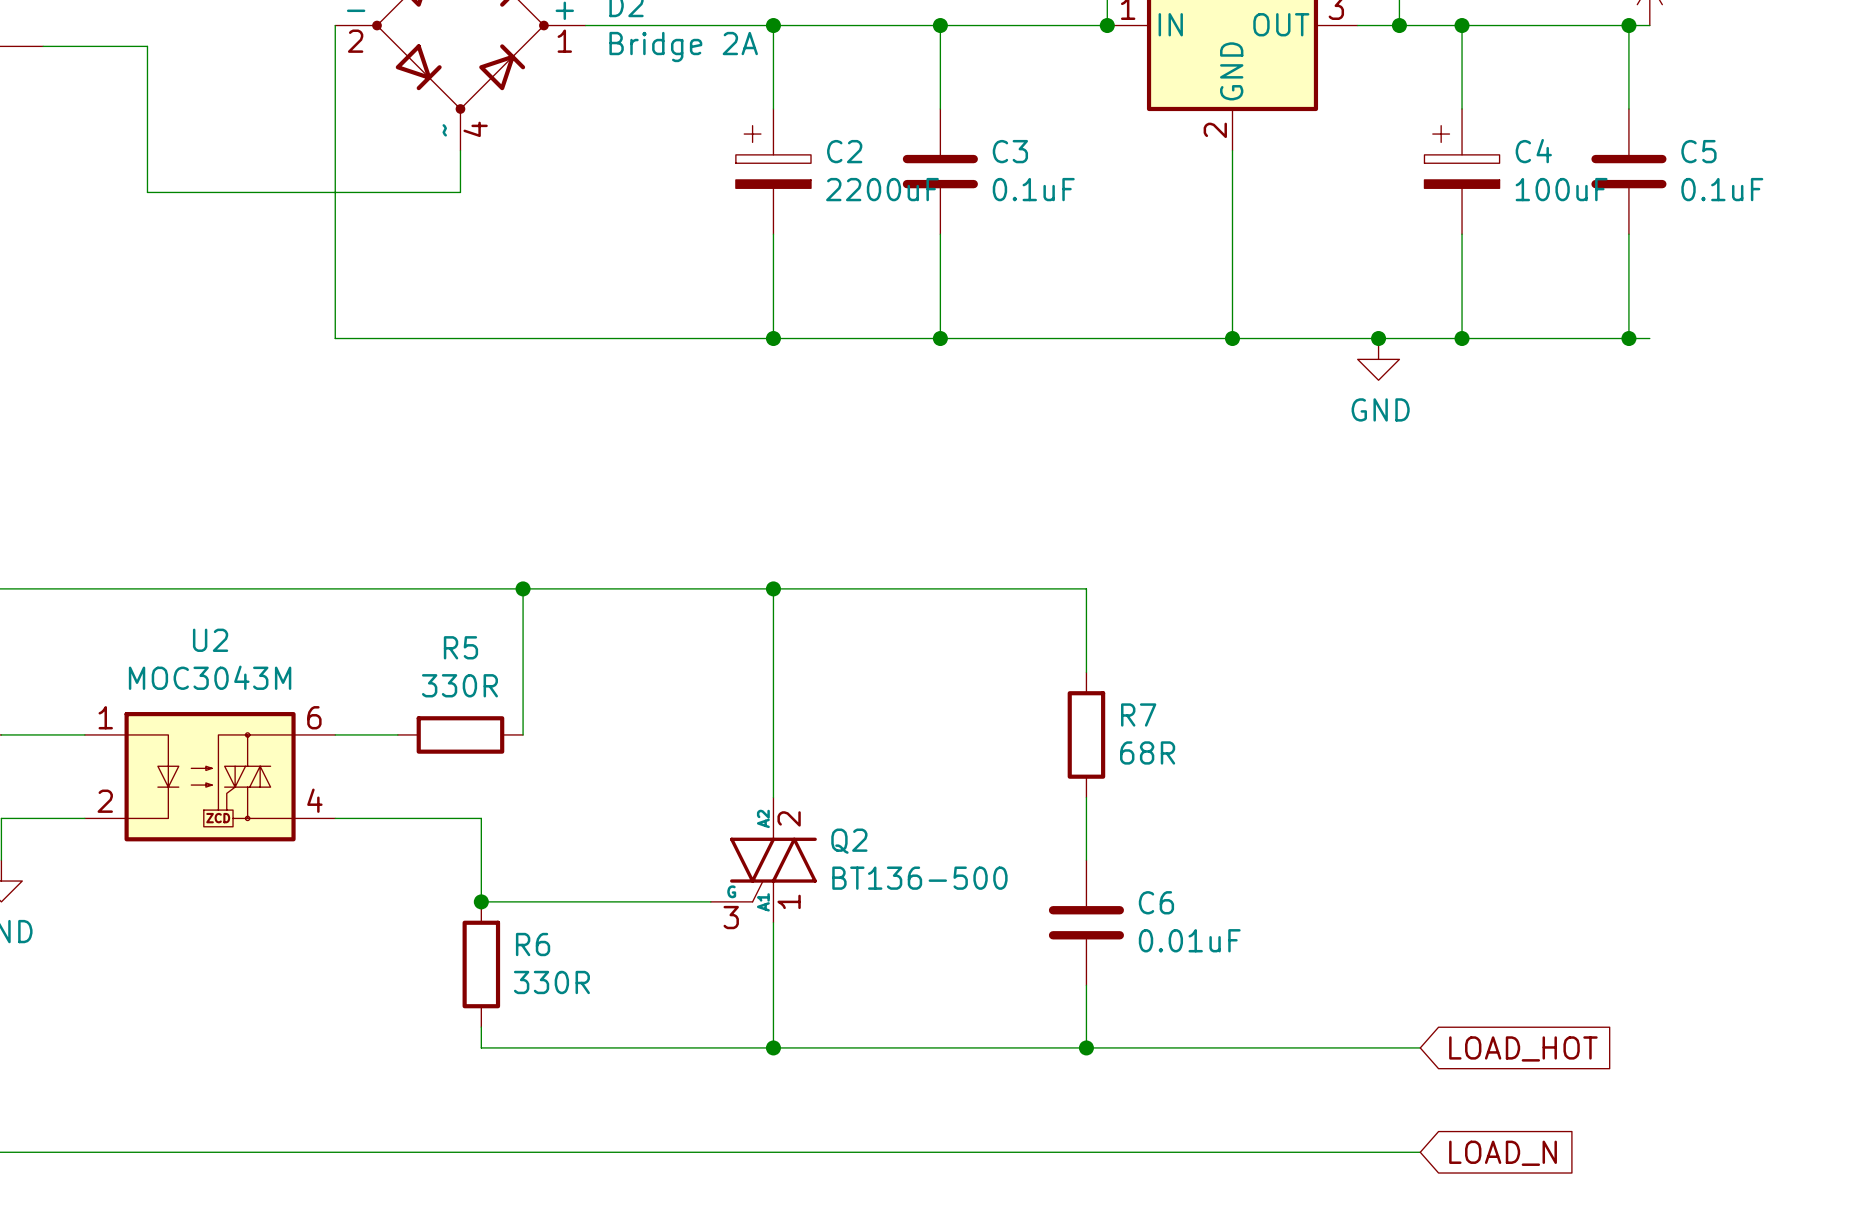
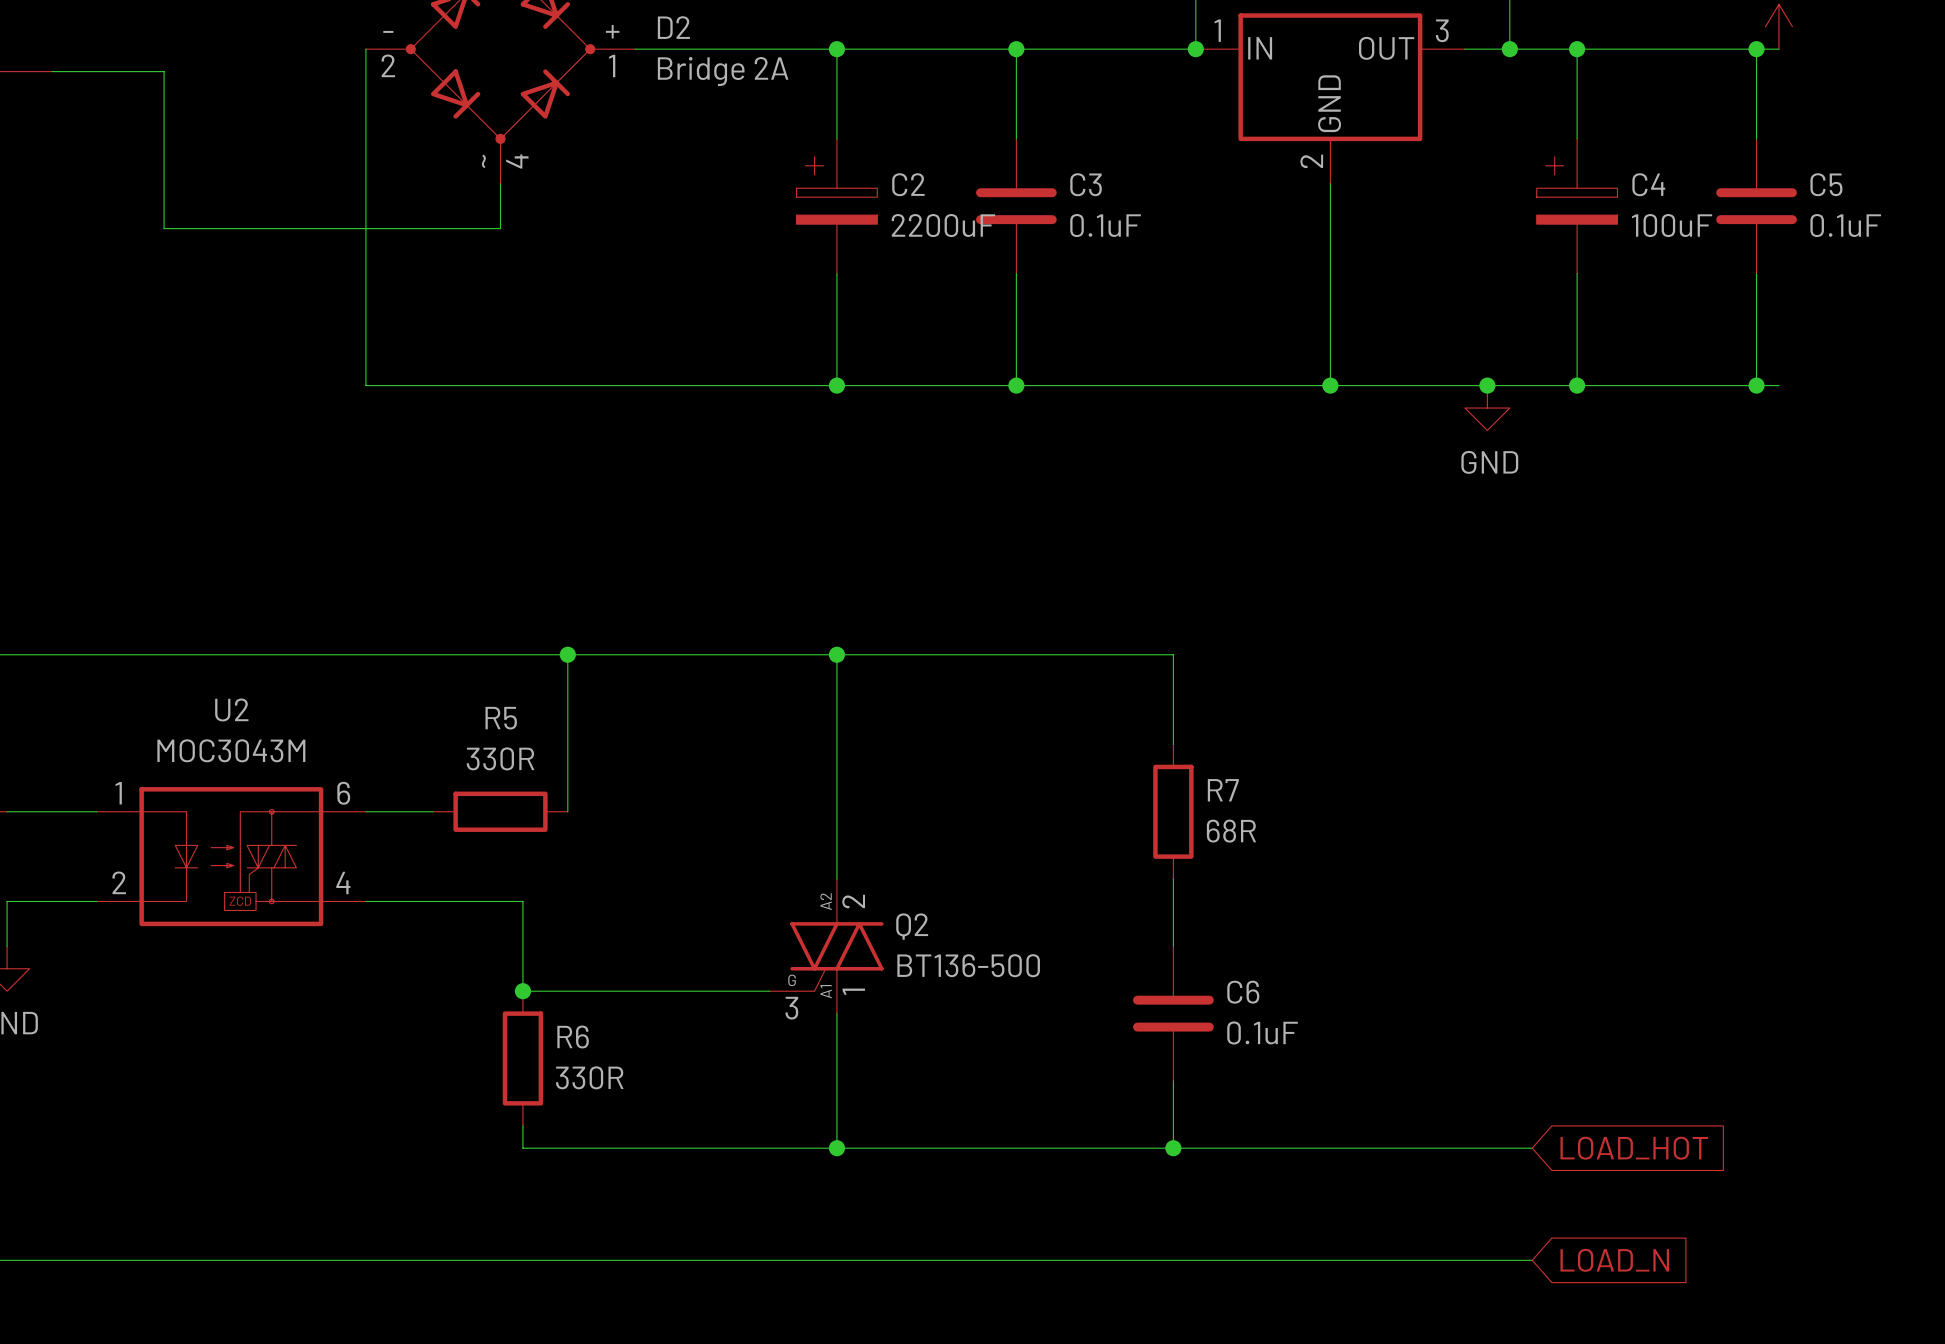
C6 value: 0.01uF (1189, 940) -> 0.1uF (1262, 1032)

